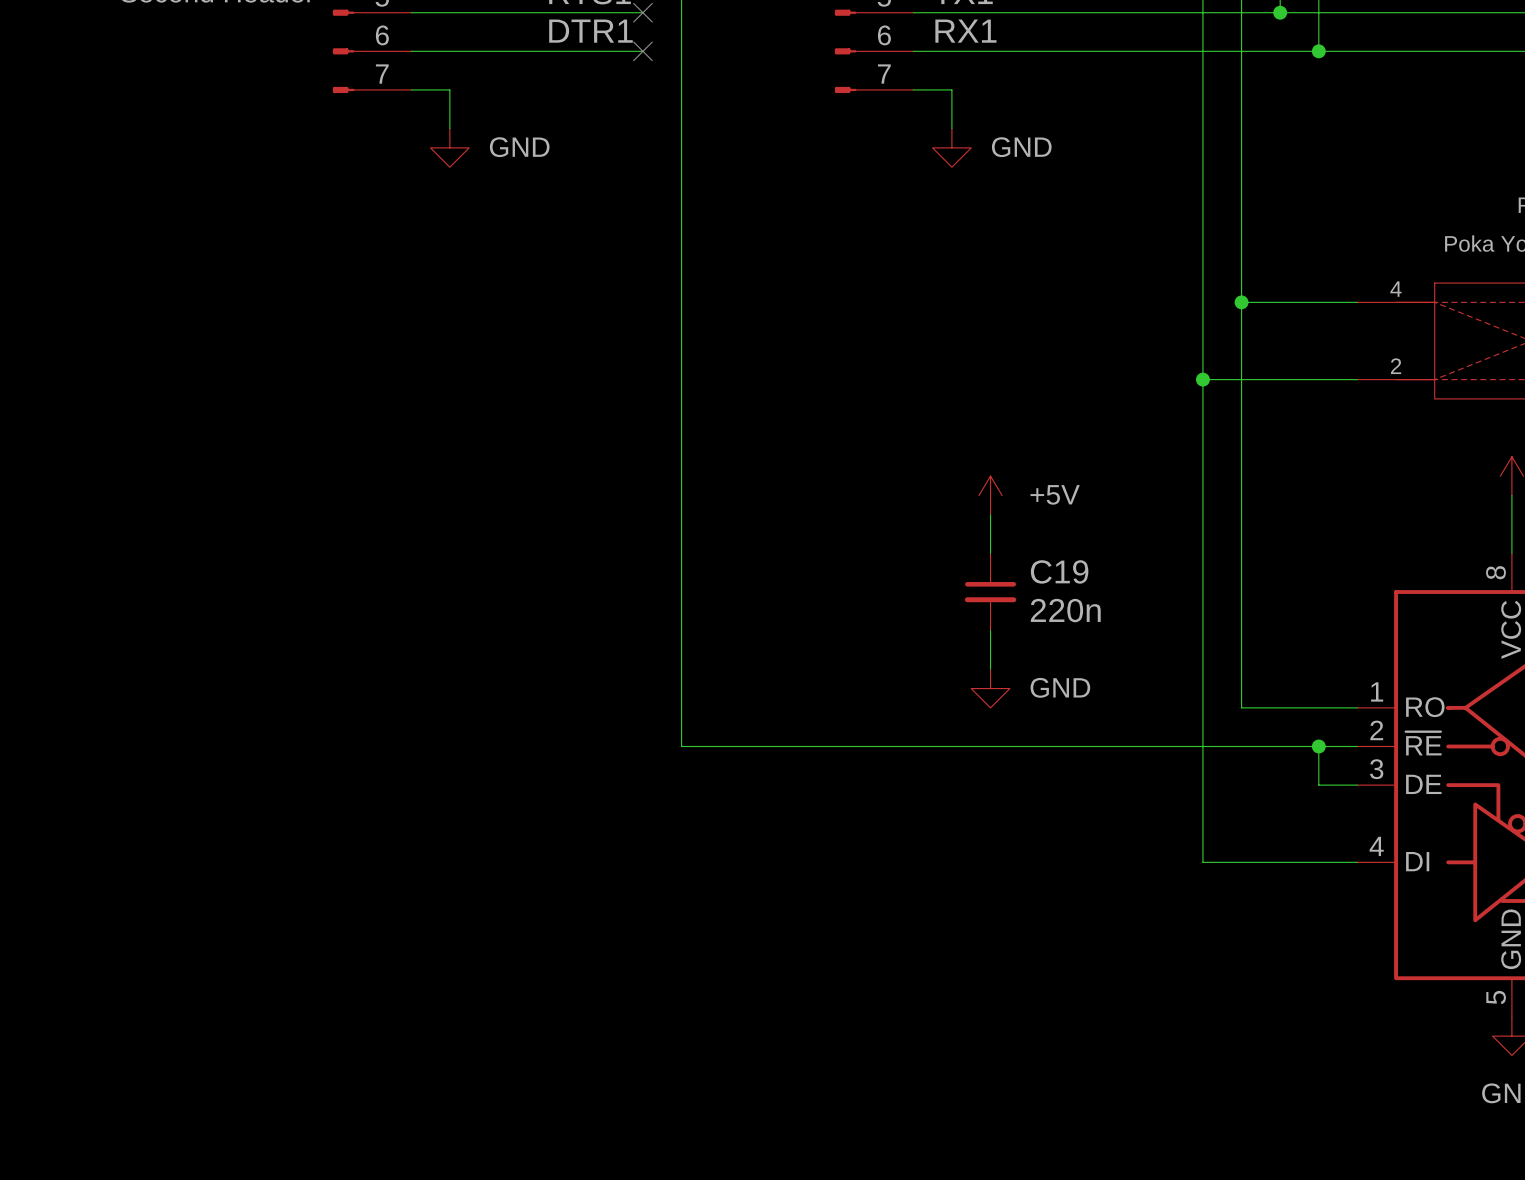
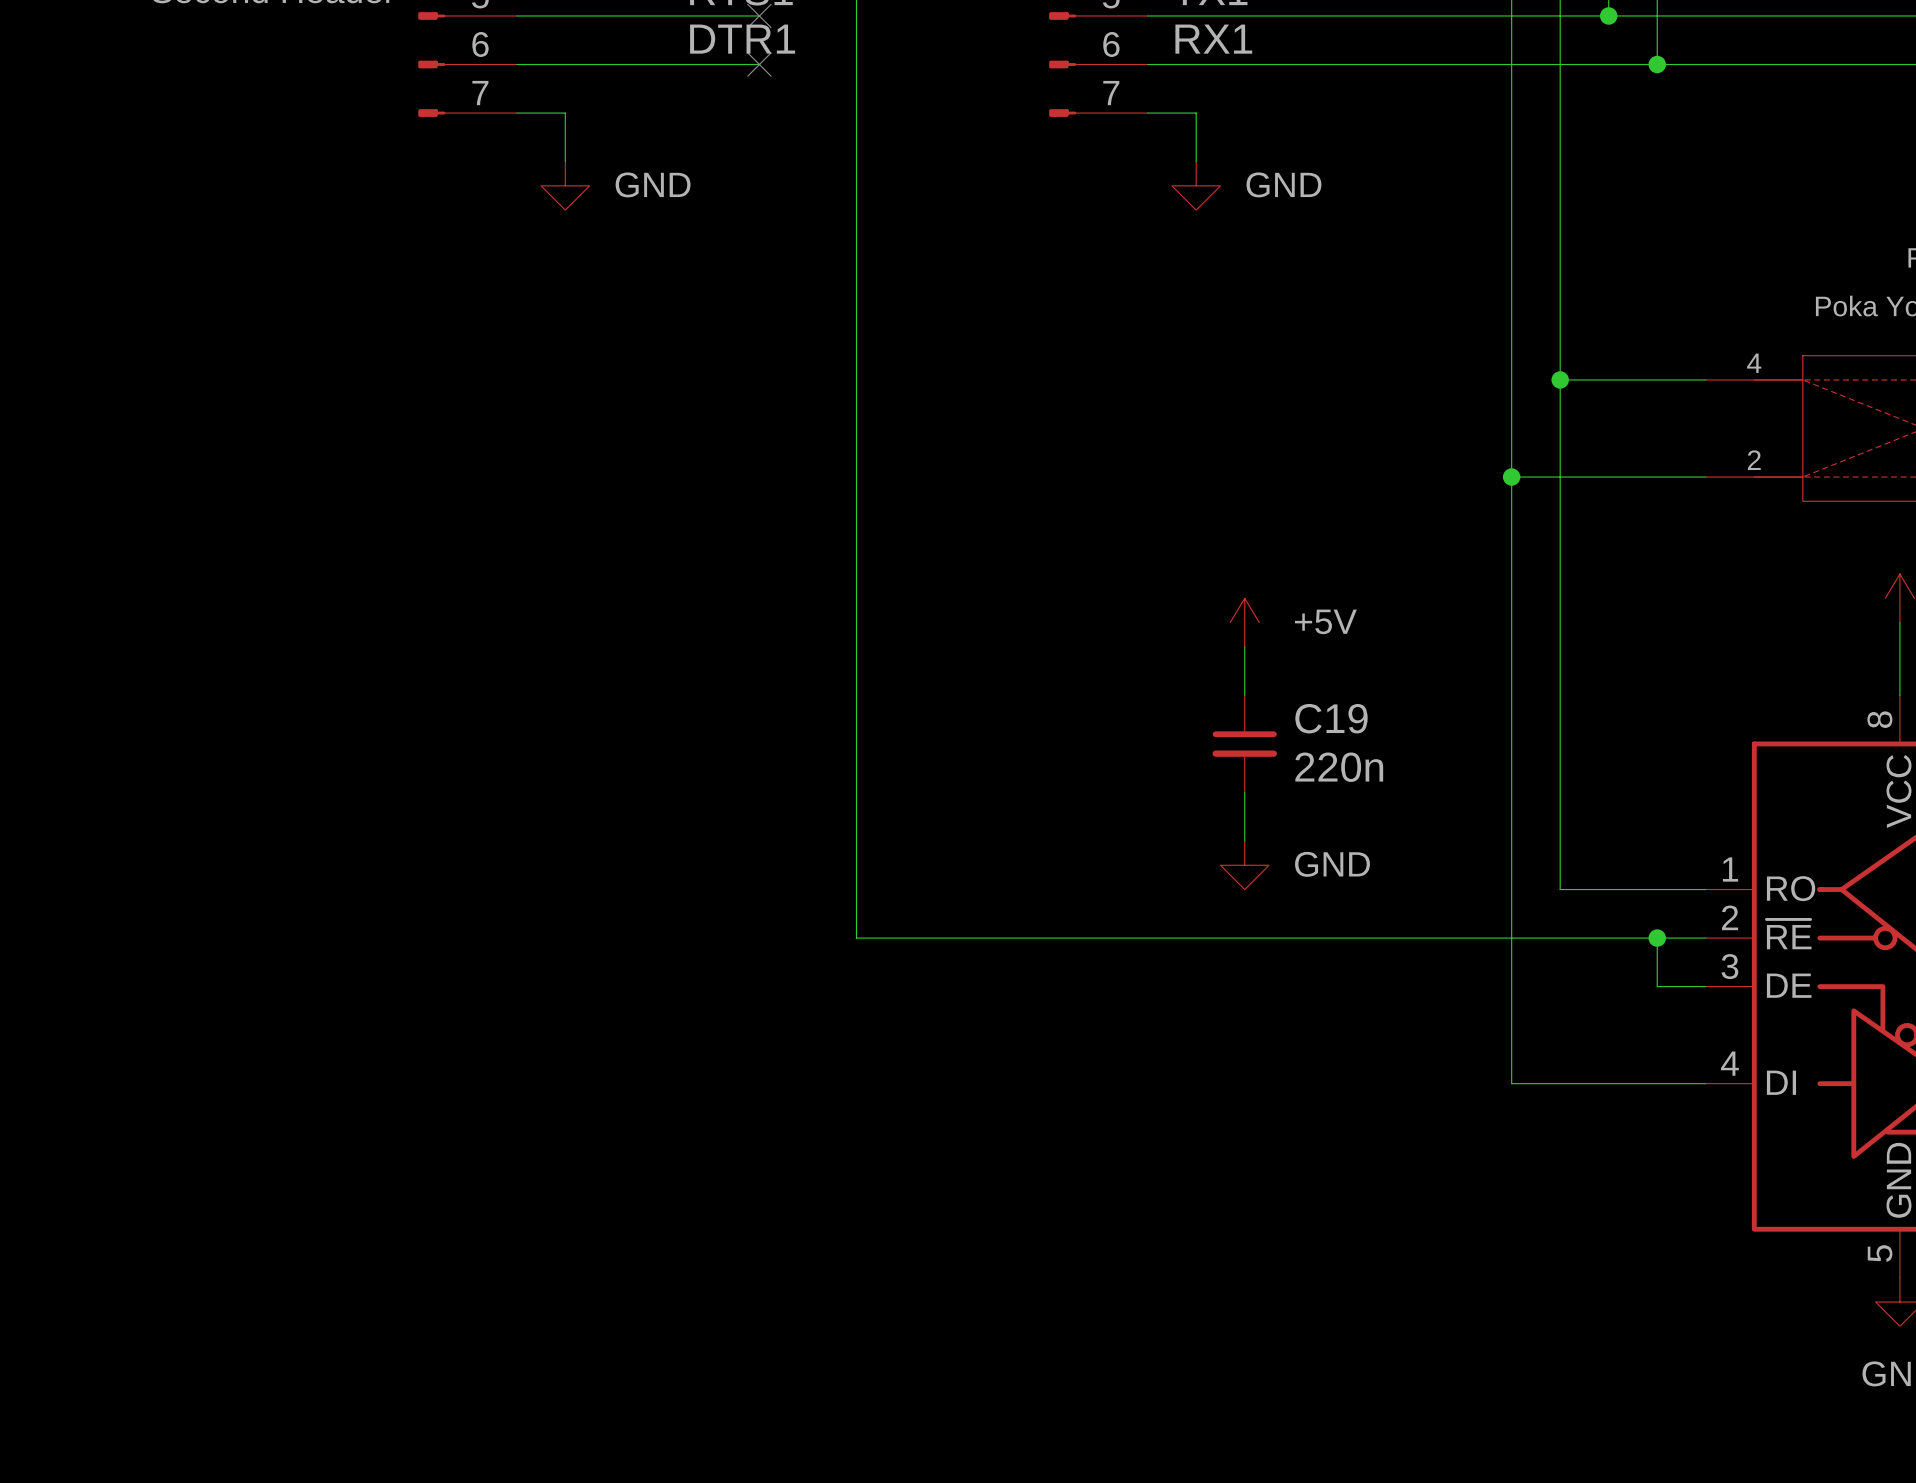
wire: (604, 12) (642, 12) -> none
no-connect mark: none -> (759, 15)
no-connect mark: (642, 12) -> none
wire: (604, 51) (642, 51) -> none
no-connect mark: none -> (759, 64)
no-connect mark: (642, 51) -> none

